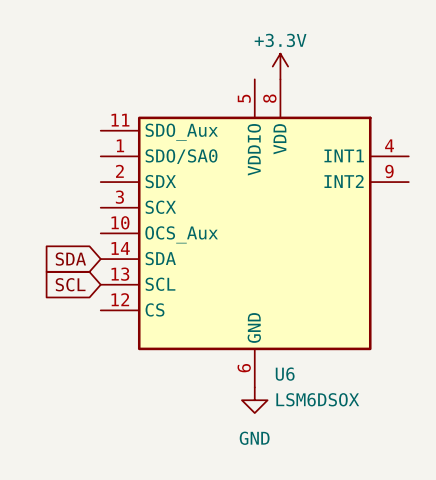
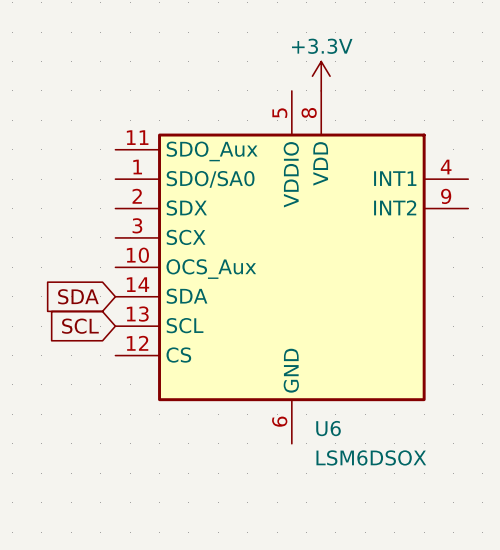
power symbol: GND (254, 400) -> none

